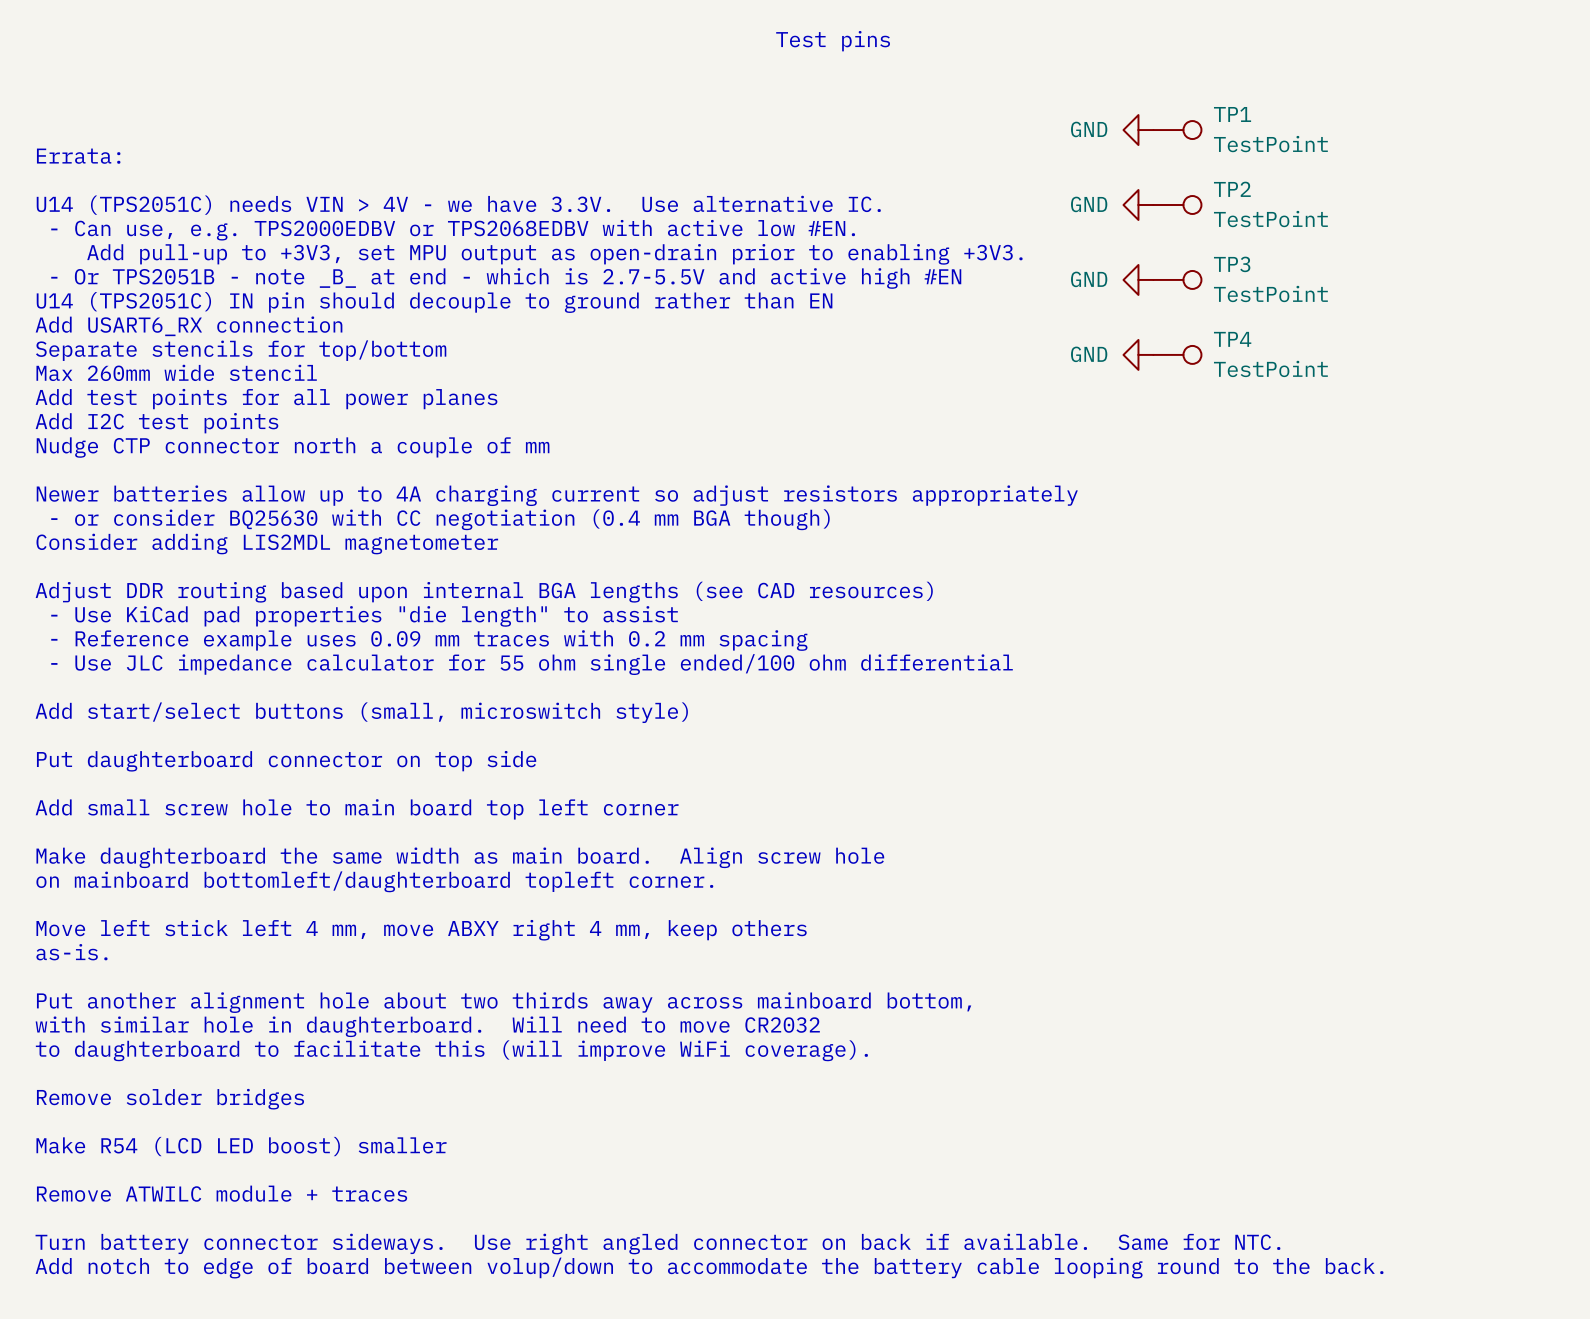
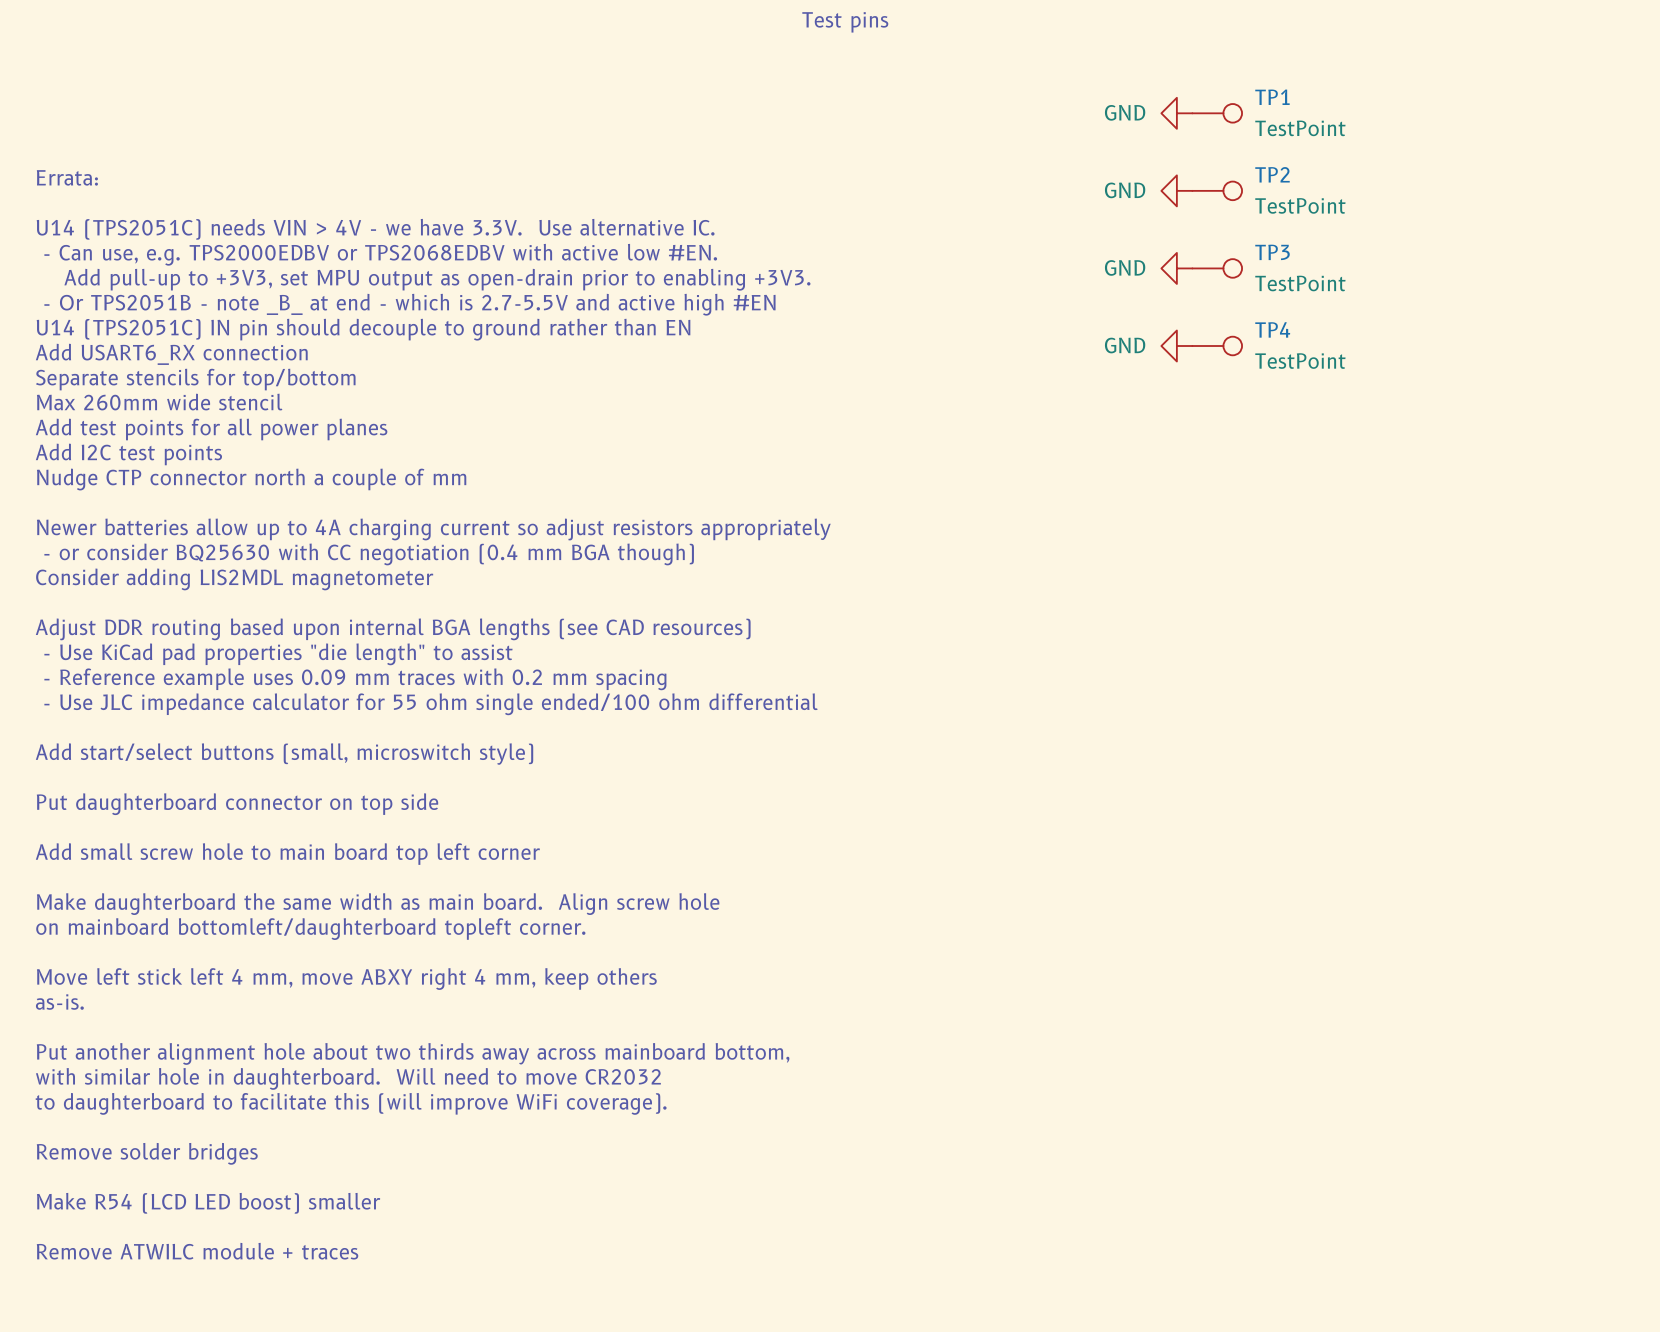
text position: Errata: (78, 156) -> Errata: (67, 177)
text position: U14 (TPS2051C) needs VIN > 4V - we have 3.3V. Use alternative IC. (458, 205) -> U14 (TPS2051C) needs VIN > 4V - we have 3.3V. Use alternative IC. (375, 229)
text position: - Can use, e.g. TPS2000EDBV or TPS2068EDBV with active low #EN. (453, 230) -> - Can use, e.g. TPS2000EDBV or TPS2068EDBV with active low #EN. (380, 254)
text position: Add pull-up to +3V3, set MPU output as open-drain prior to enabling +3V3. (554, 254) -> Add pull-up to +3V3, set MPU output as open-drain prior to enabling +3V3. (437, 279)
text position: - Or TPS2051B - note _B_ at end - which is 2.7-5.5V and active high #EN (506, 278) -> - Or TPS2051B - note _B_ at end - which is 2.7-5.5V and active high #EN (409, 304)
text position: U14 (TPS2051C) IN pin should decouple to ground rather than EN (434, 302) -> U14 (TPS2051C) IN pin should decouple to ground rather than EN (363, 329)
text position: Add USART6_RX connection (189, 326) -> Add USART6_RX connection (171, 354)
text position: Separate stencils for top/bottom (241, 350) -> Separate stencils for top/bottom (195, 379)
text position: Max 260mm wide stencil (176, 372) -> Max 260mm wide stencil (159, 402)
text position: Add test points for all power planes (266, 399) -> Add test points for all power planes (211, 429)
text position: Add I2C test points (156, 423) -> Add I2C test points (128, 454)
text position: Nudge CTP connector north a couple of mm (293, 447) -> Nudge CTP connector north a couple of mm (251, 479)
text position: Newer batteries allow up to 4A charging current so adjust resistors appropriately (557, 495) -> Newer batteries allow up to 4A charging current so adjust resistors appropriately (433, 529)
text position: - or consider BQ25630 with CC negotiation (0.4 mm BGA though) (440, 519) -> - or consider BQ25630 with CC negotiation (0.4 mm BGA though) (369, 554)
text position: Consider adding LIS2MDL magnetometer (267, 544) -> Consider adding LIS2MDL magnetometer (234, 579)
text position: Adjust DDR routing based upon internal BGA lengths (see CAD resources) (484, 592) -> Adjust DDR routing based upon internal BGA lengths (see CAD resources) (393, 629)
text position: - Use KiCad pad properties "die length" to assist (364, 616) -> - Use KiCad pad properties "die length" to assist (278, 654)
text position: - Reference example uses 0.09 mm traces with 0.2 mm spacing (429, 640) -> - Reference example uses 0.09 mm traces with 0.2 mm spacing (355, 679)
text position: - Use JLC impedance calculator for 55 ohm single ended/100 ohm differential (532, 664) -> - Use JLC impedance calculator for 55 ohm single ended/100 ohm differential (431, 704)
text position: Add start/select buttons (small, microswitch style) (361, 712) -> Add start/select buttons (small, microswitch style) (284, 754)
text position: Put daughterboard connector on top side (286, 761) -> Put daughterboard connector on top side (237, 804)
text position: Add small screw hole to main board top left corner (357, 809) -> Add small screw hole to main board top left corner (287, 854)
text position: Make daughterboard the same width as main board. Align screw hole (460, 857) -> Make daughterboard the same width as main board. Align screw hole (378, 904)
text position: on mainboard bottomleft/daughterboard topleft corner. (374, 881) -> on mainboard bottomleft/daughterboard topleft corner. (310, 929)
text position: Move left stick left 4 mm, move ABXY right 4 mm, keep others (421, 930) -> Move left stick left 4 mm, move ABXY right 4 mm, keep others (346, 979)
text position: as-is. (71, 952) -> as-is. (59, 1002)
text position: Put another alignment hole about two thirds away across mainboard bottom, (504, 1002) -> Put another alignment hole about two thirds away across mainboard bottom, (413, 1053)
text position: with similar hole in daughterboard. Will need to move CR2032 (427, 1026) -> with similar hole in daughterboard. Will need to move CR2032 (348, 1078)
text position: to daughterboard to facilitate this (will improve WiFi coverage). (451, 1050) -> to daughterboard to facilitate this (will improve WiFi coverage). (351, 1103)
text position: Remove solder bridges (170, 1099) -> Remove solder bridges (147, 1153)
text position: Make R54 (LCD LED boost) smaller (241, 1146) -> Make R54 (LCD LED boost) smaller (208, 1203)
text position: Remove ATWILC module + traces (222, 1193) -> Remove ATWILC module + traces (197, 1251)
text: Turn battery connector sideways. Use right angled connector on back if available. Same for NTC. (657, 1244) -> none
text: Add notch to edge of board between volup/down to accommodate the battery cable looping round to the back. (709, 1268) -> none

